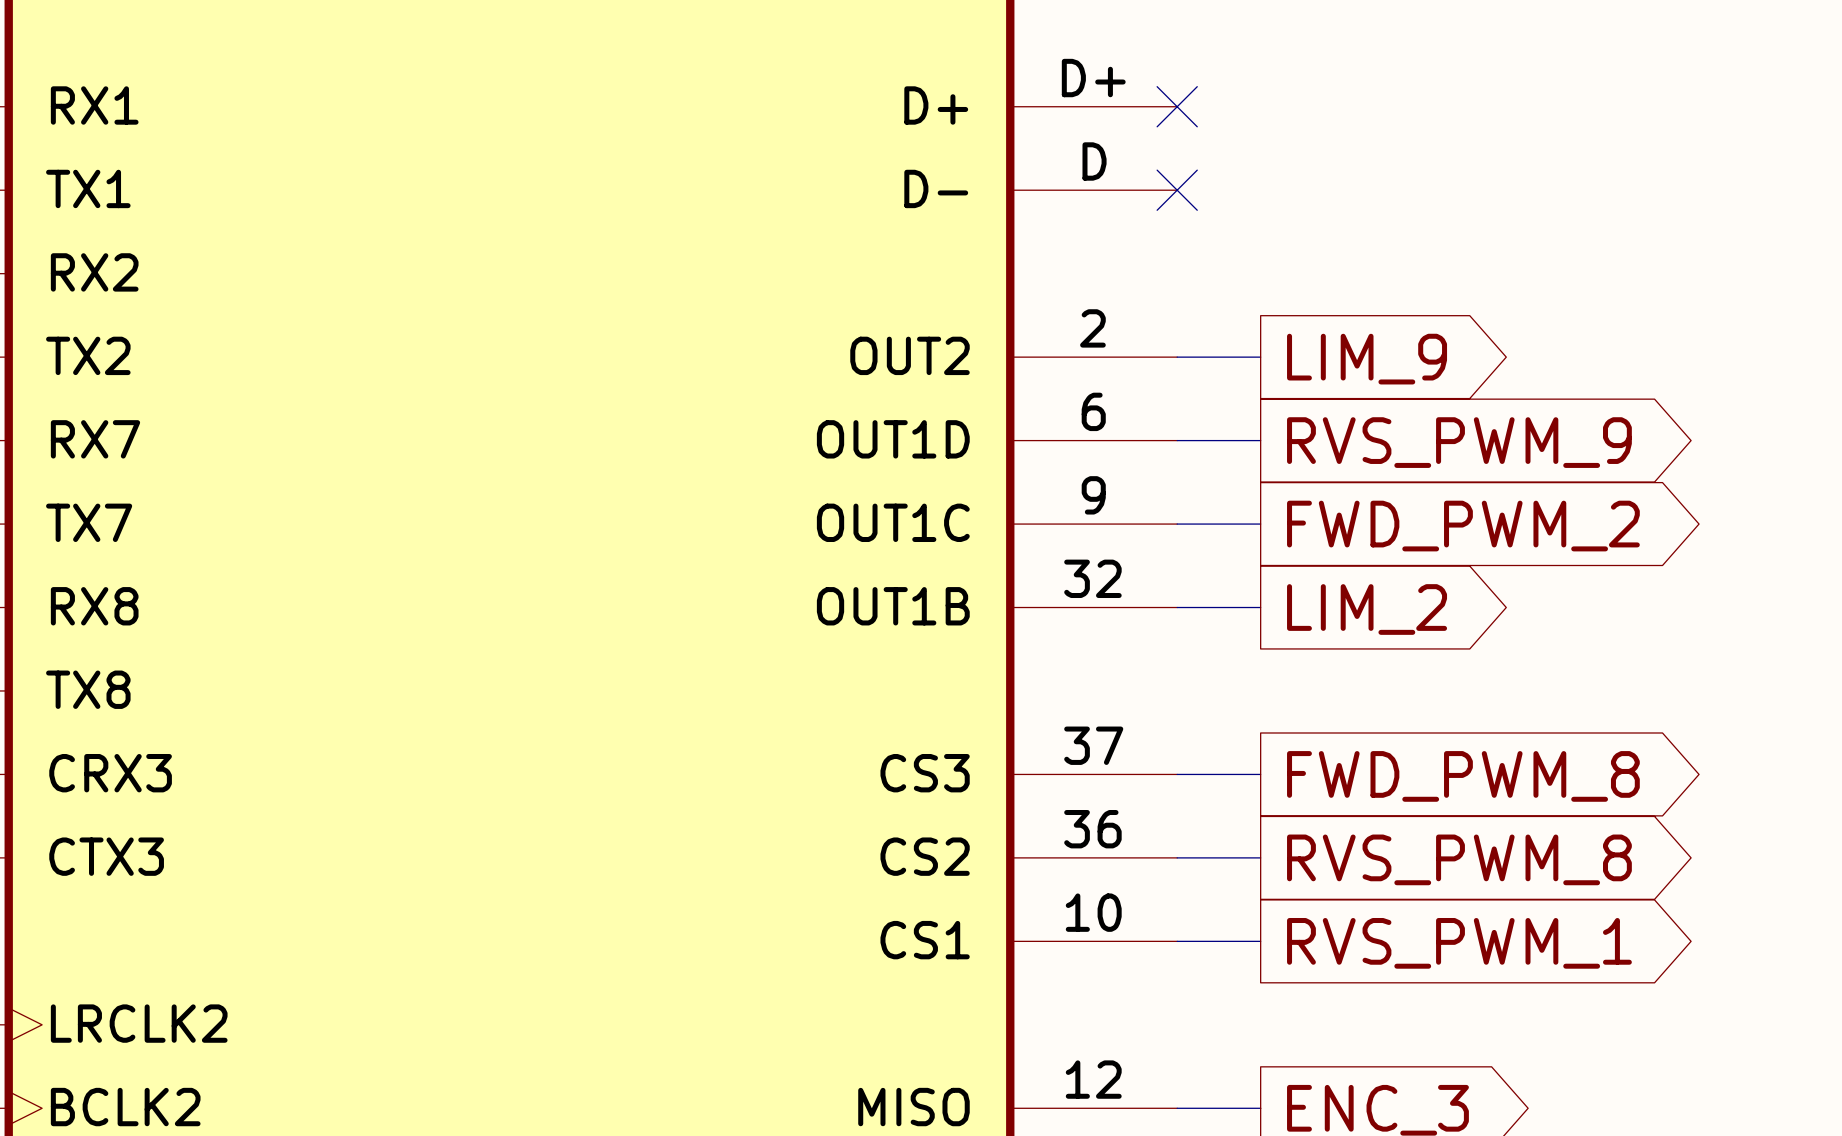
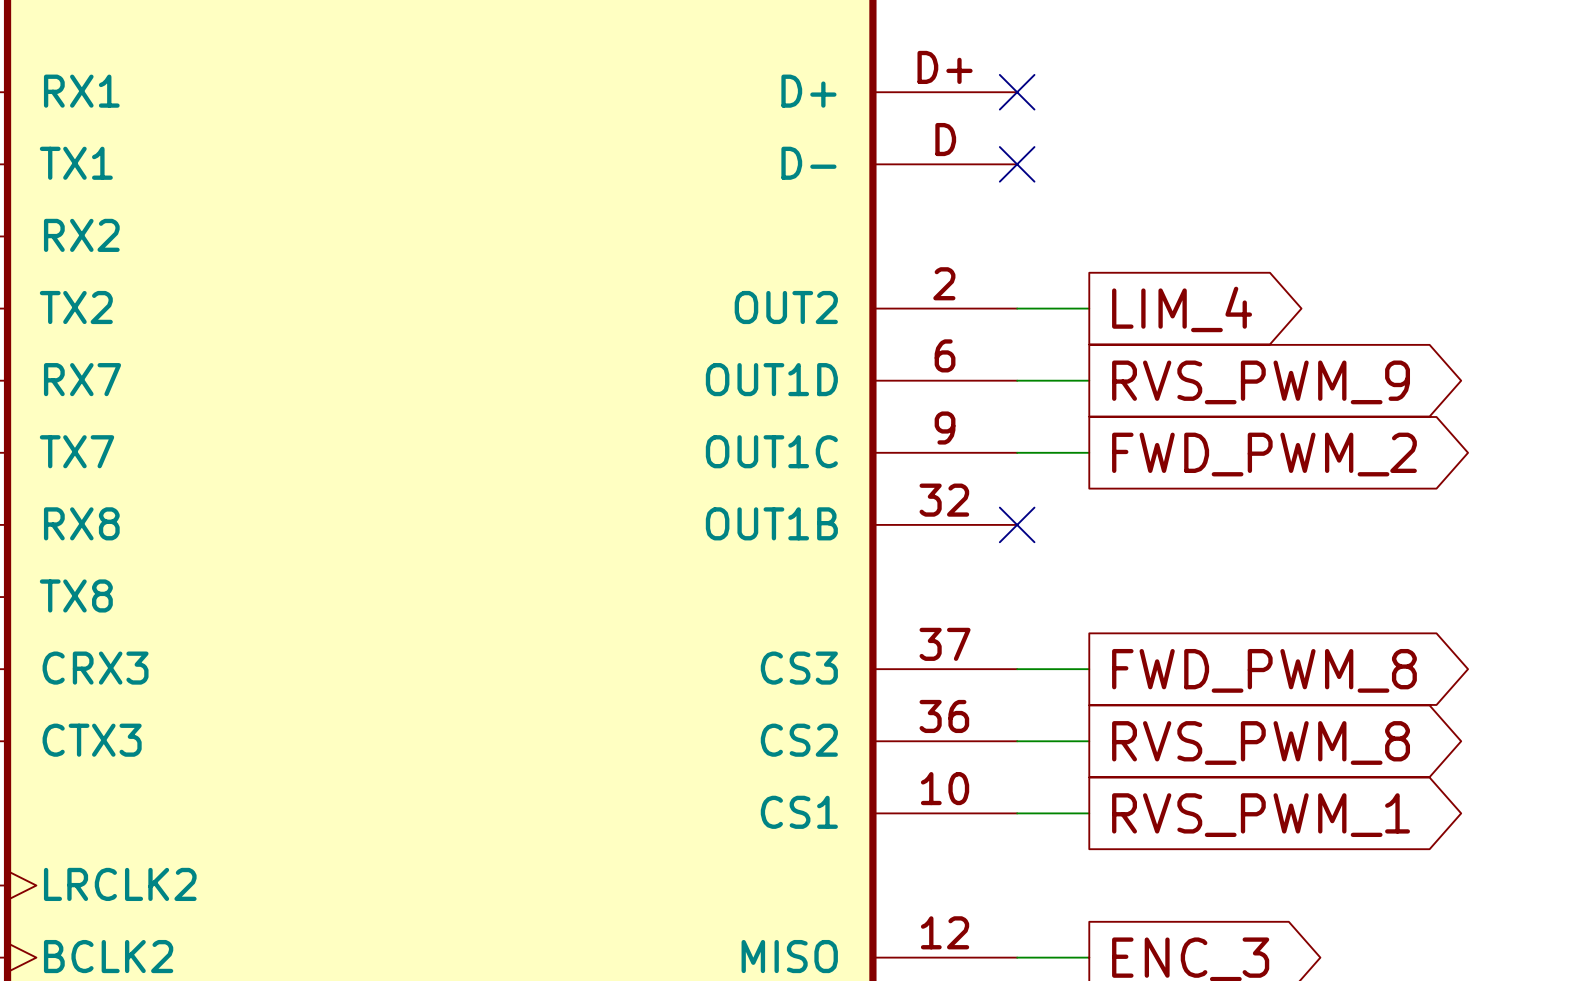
global label: LIM_9 (1367, 359) -> LIM_4 (1182, 309)
wire: (1177, 607) (1260, 607) -> none
no-connect mark: none -> (1017, 524)
global label: LIM_2 (1367, 609) -> none

